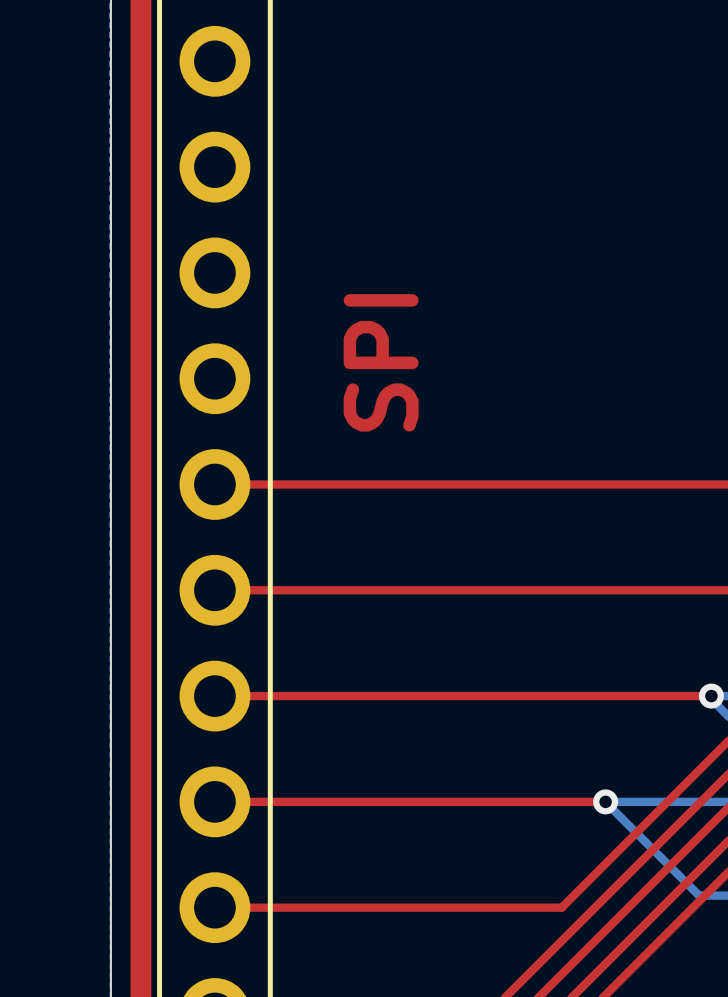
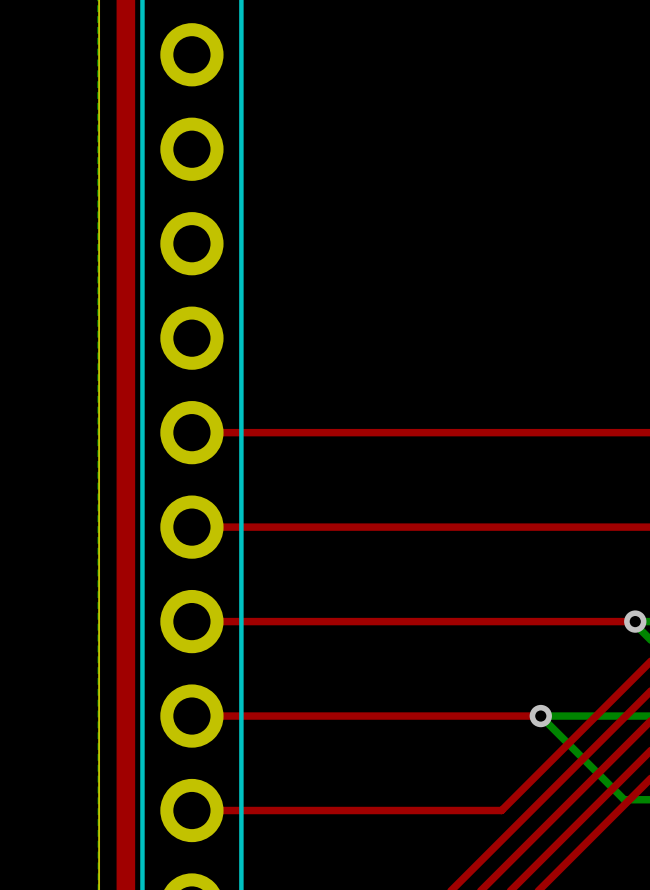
text: SPI (381, 362) -> none

